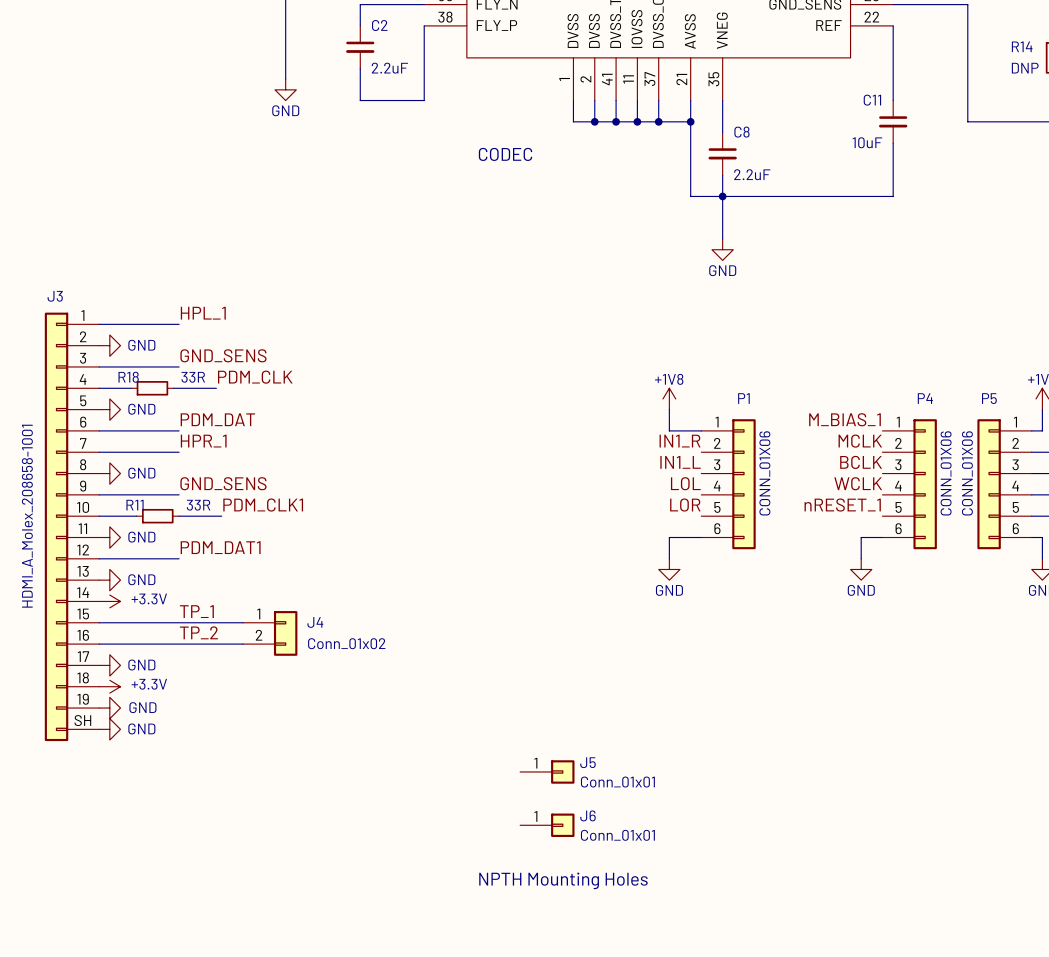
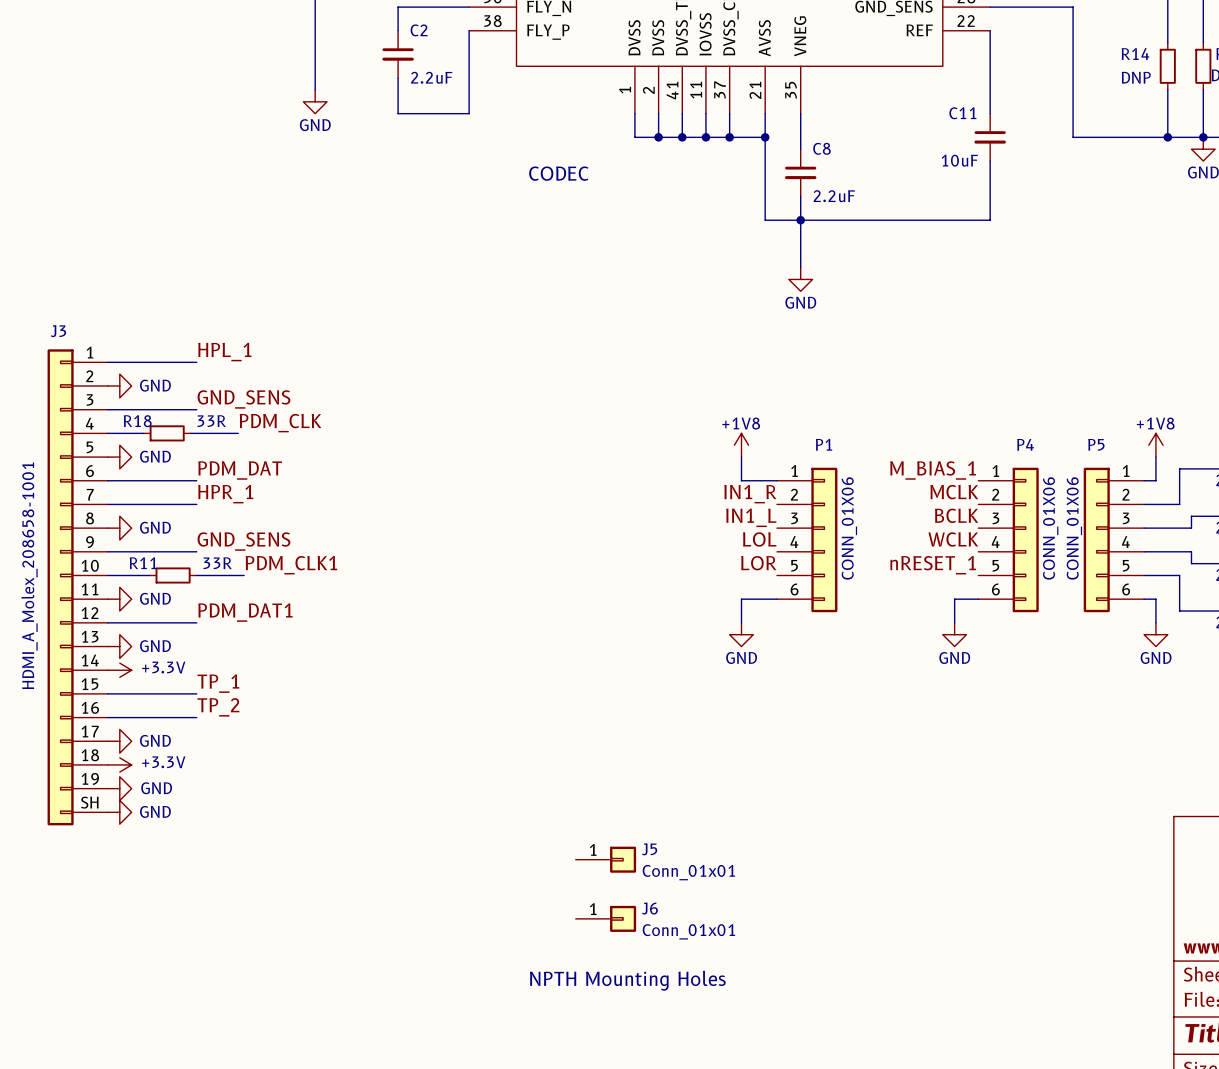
wire: (179, 622) (243, 622) -> none
J4: Conn_01x02 (270, 633) -> none
wire: (179, 644) (243, 644) -> none

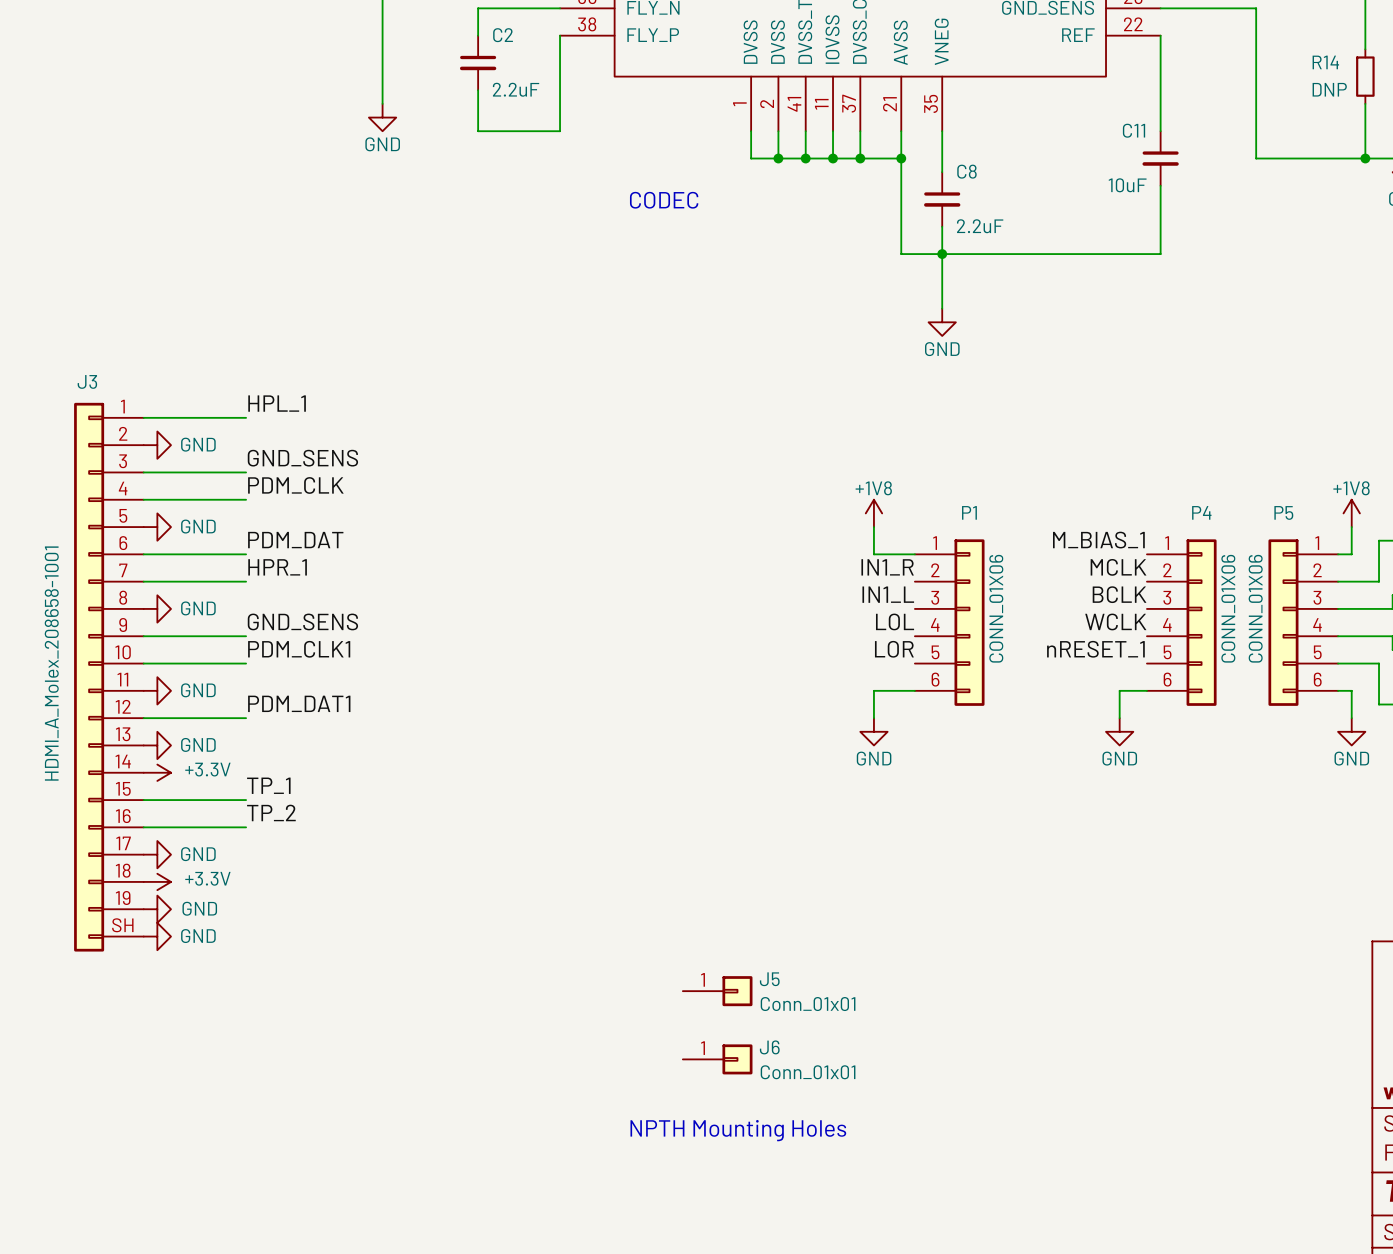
label position: PDM_CLK (280, 423) -> PDM_CLK (295, 485)
wire: none -> (184, 499) (239, 499)
R18: 33R (167, 433) -> none
wire: (196, 433) (238, 433) -> none
label position: PDM_CLK1 (291, 565) -> PDM_CLK1 (299, 649)
R11: 33R (173, 575) -> none
wire: (196, 575) (244, 575) -> (246, 663) (191, 663)

